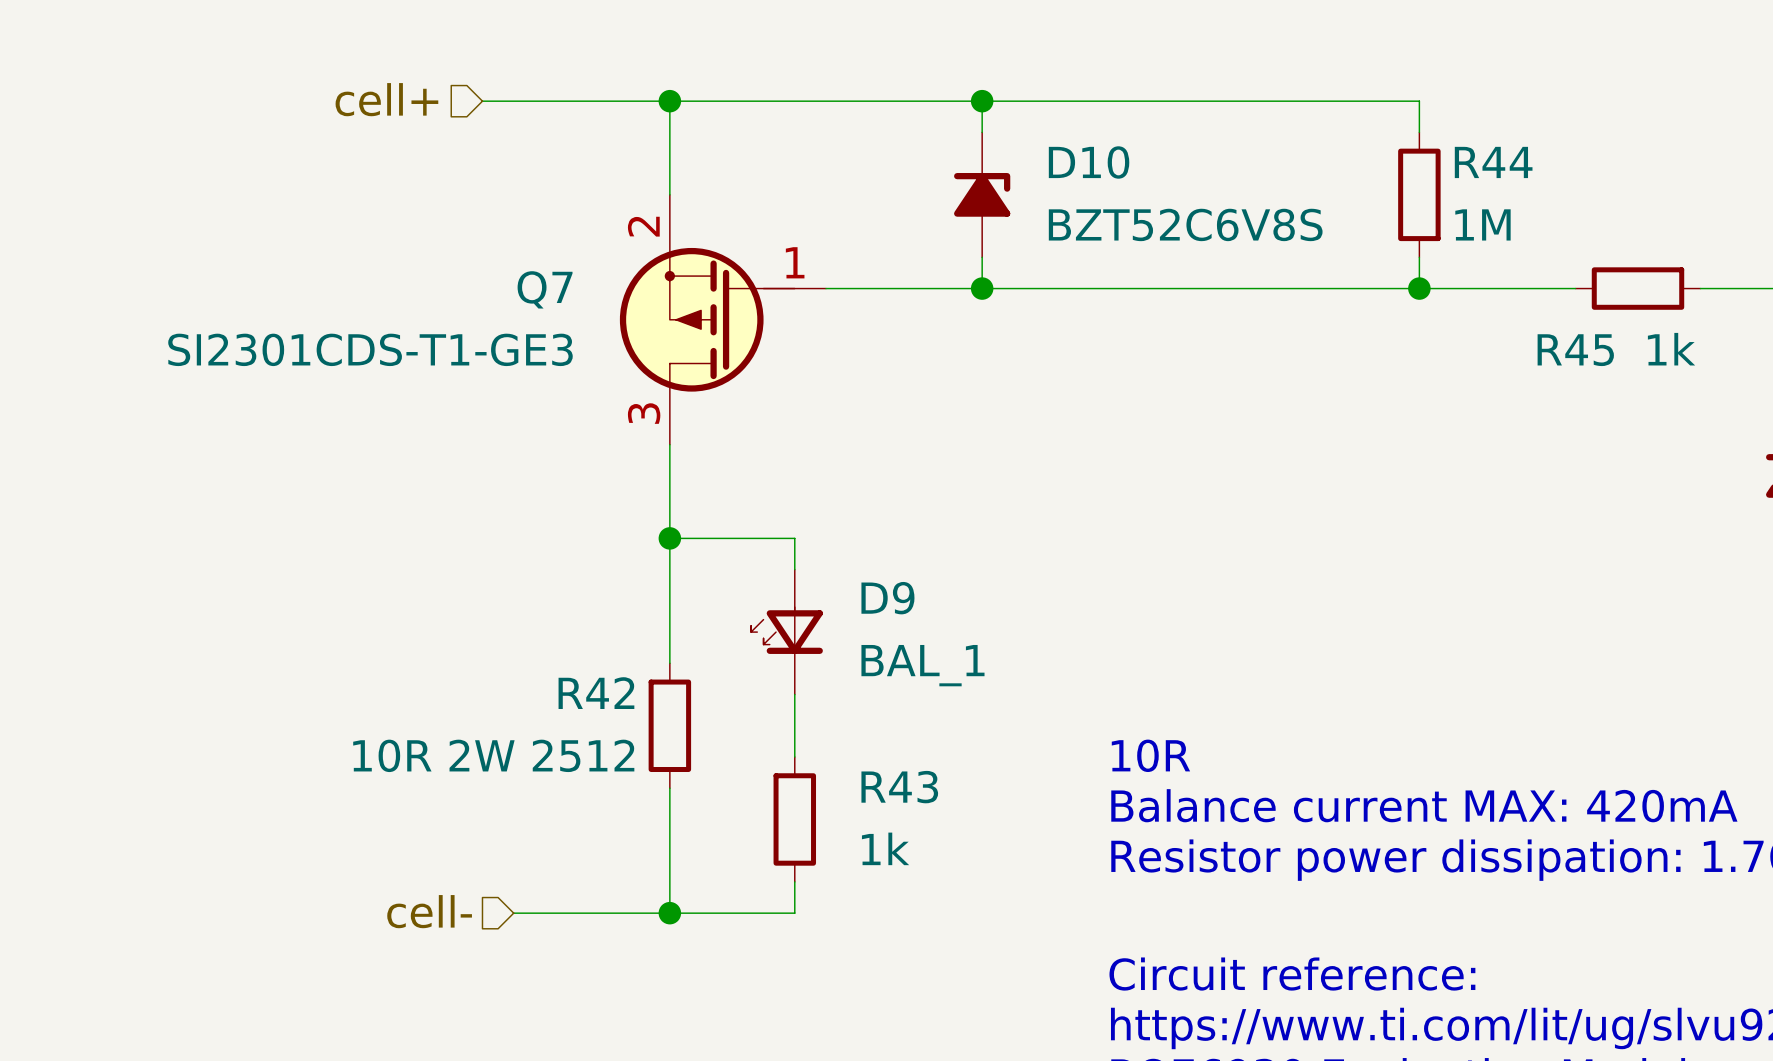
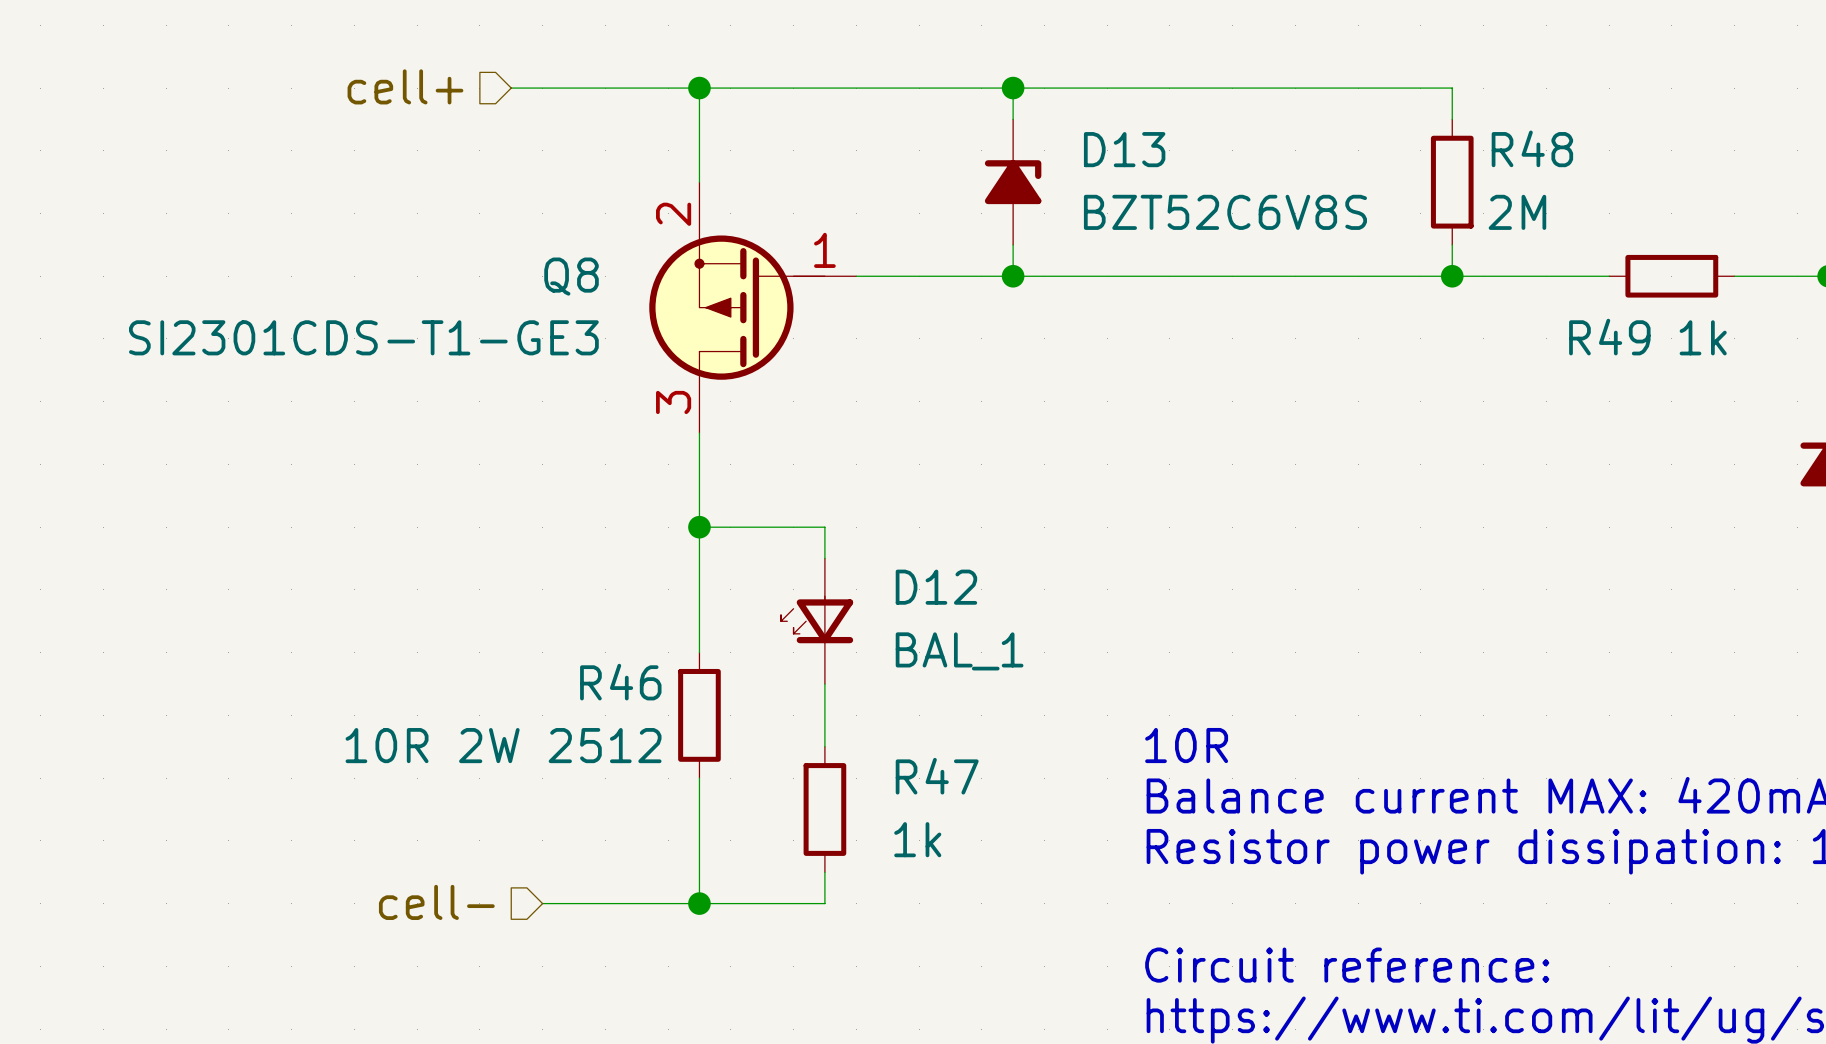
D10 name: D10 (1089, 162) -> D13 (1124, 149)
R44 name: R44 (1493, 162) -> R48 (1532, 148)
R44 value: 1M (1482, 224) -> 2M (1517, 212)
Q7 name: Q7 (545, 289) -> Q8 (571, 276)
R45 name: R45 (1575, 350) -> R49 (1609, 337)
D9 name: D9 (887, 598) -> D12 (936, 587)
R42 name: R42 (596, 693) -> R46 (620, 682)
R43 name: R43 (899, 787) -> R47 (937, 776)

